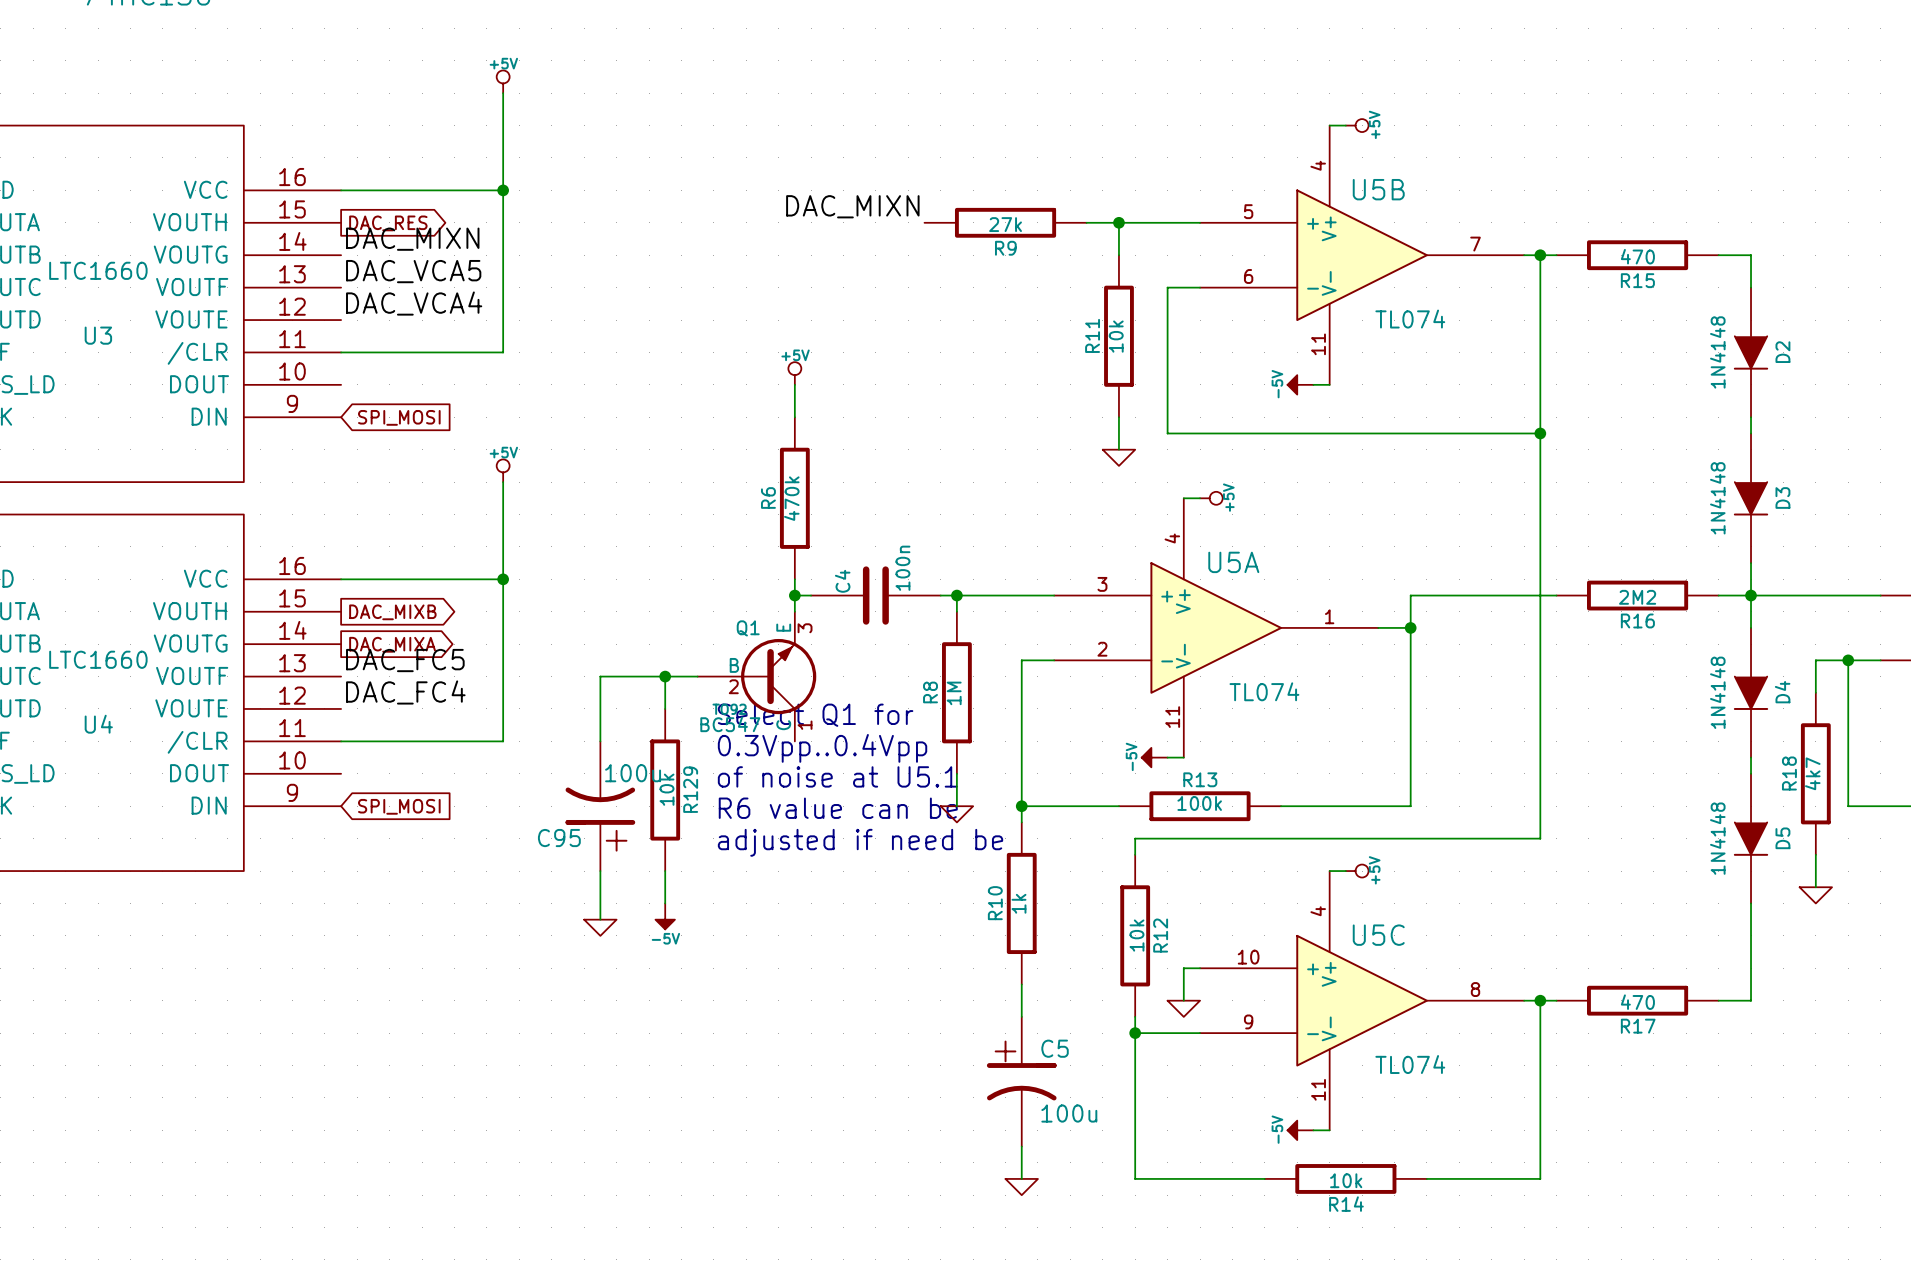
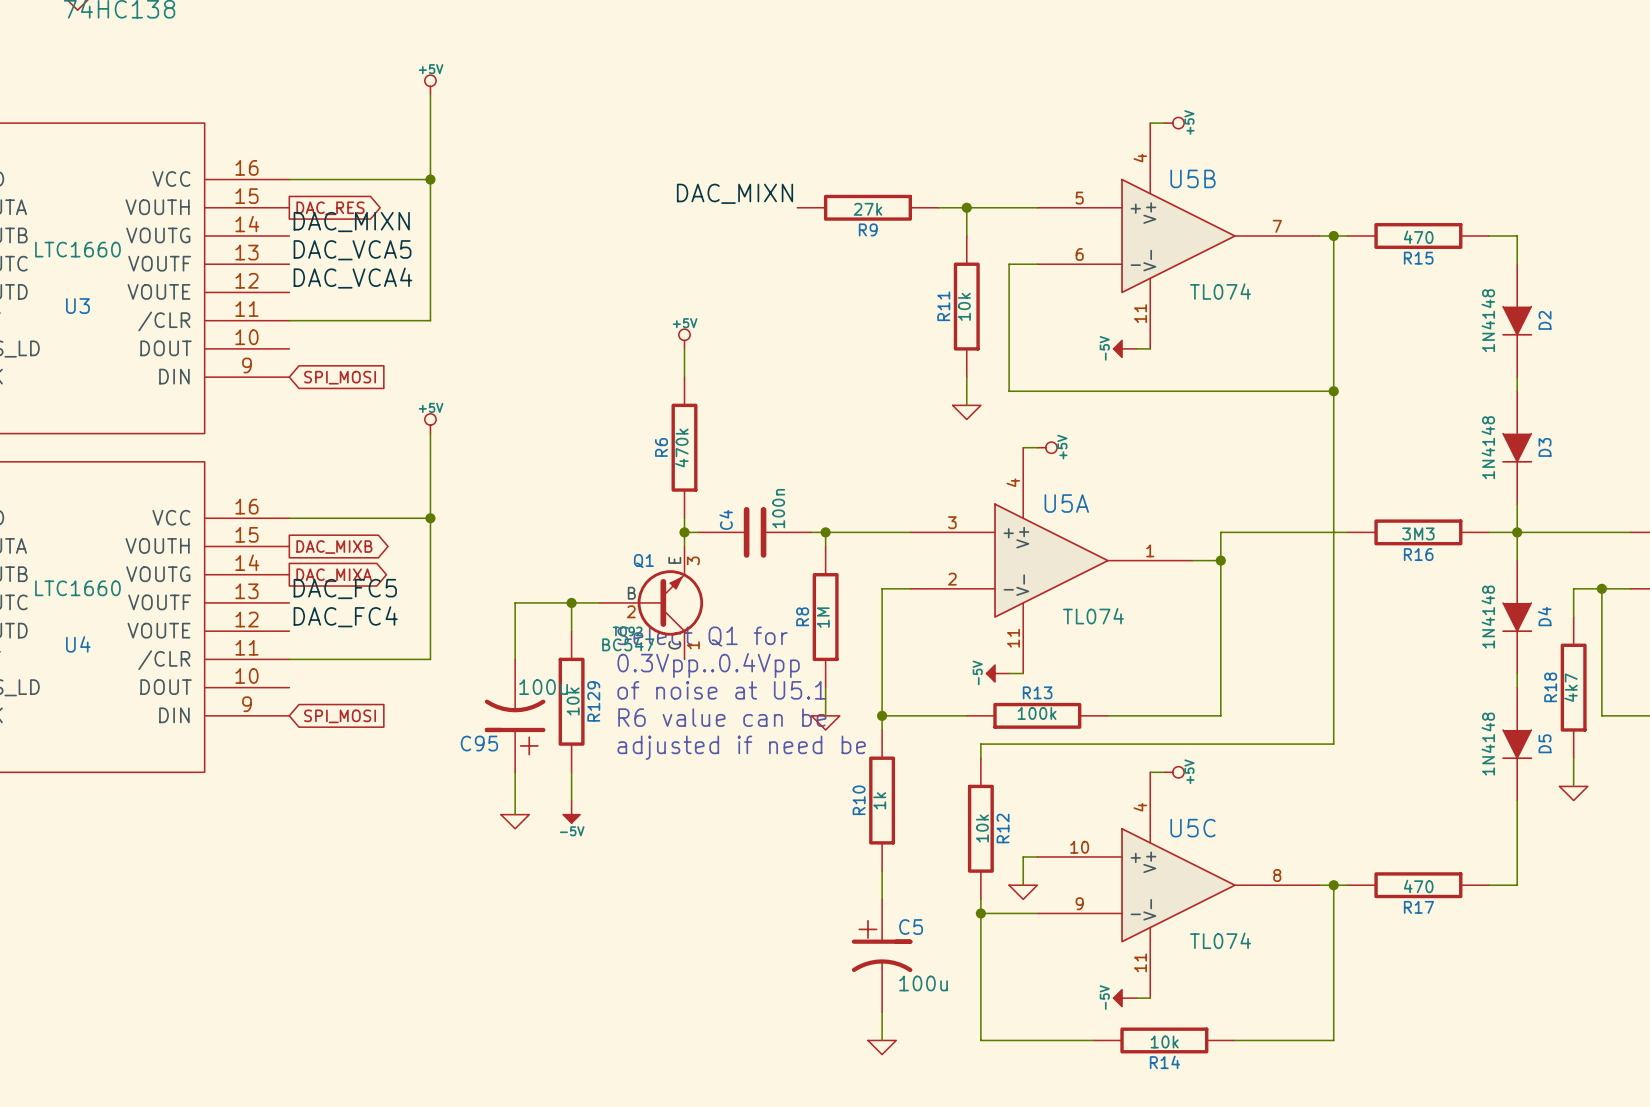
R16 value: 2M2 (1637, 597) -> 3M3 (1418, 533)

